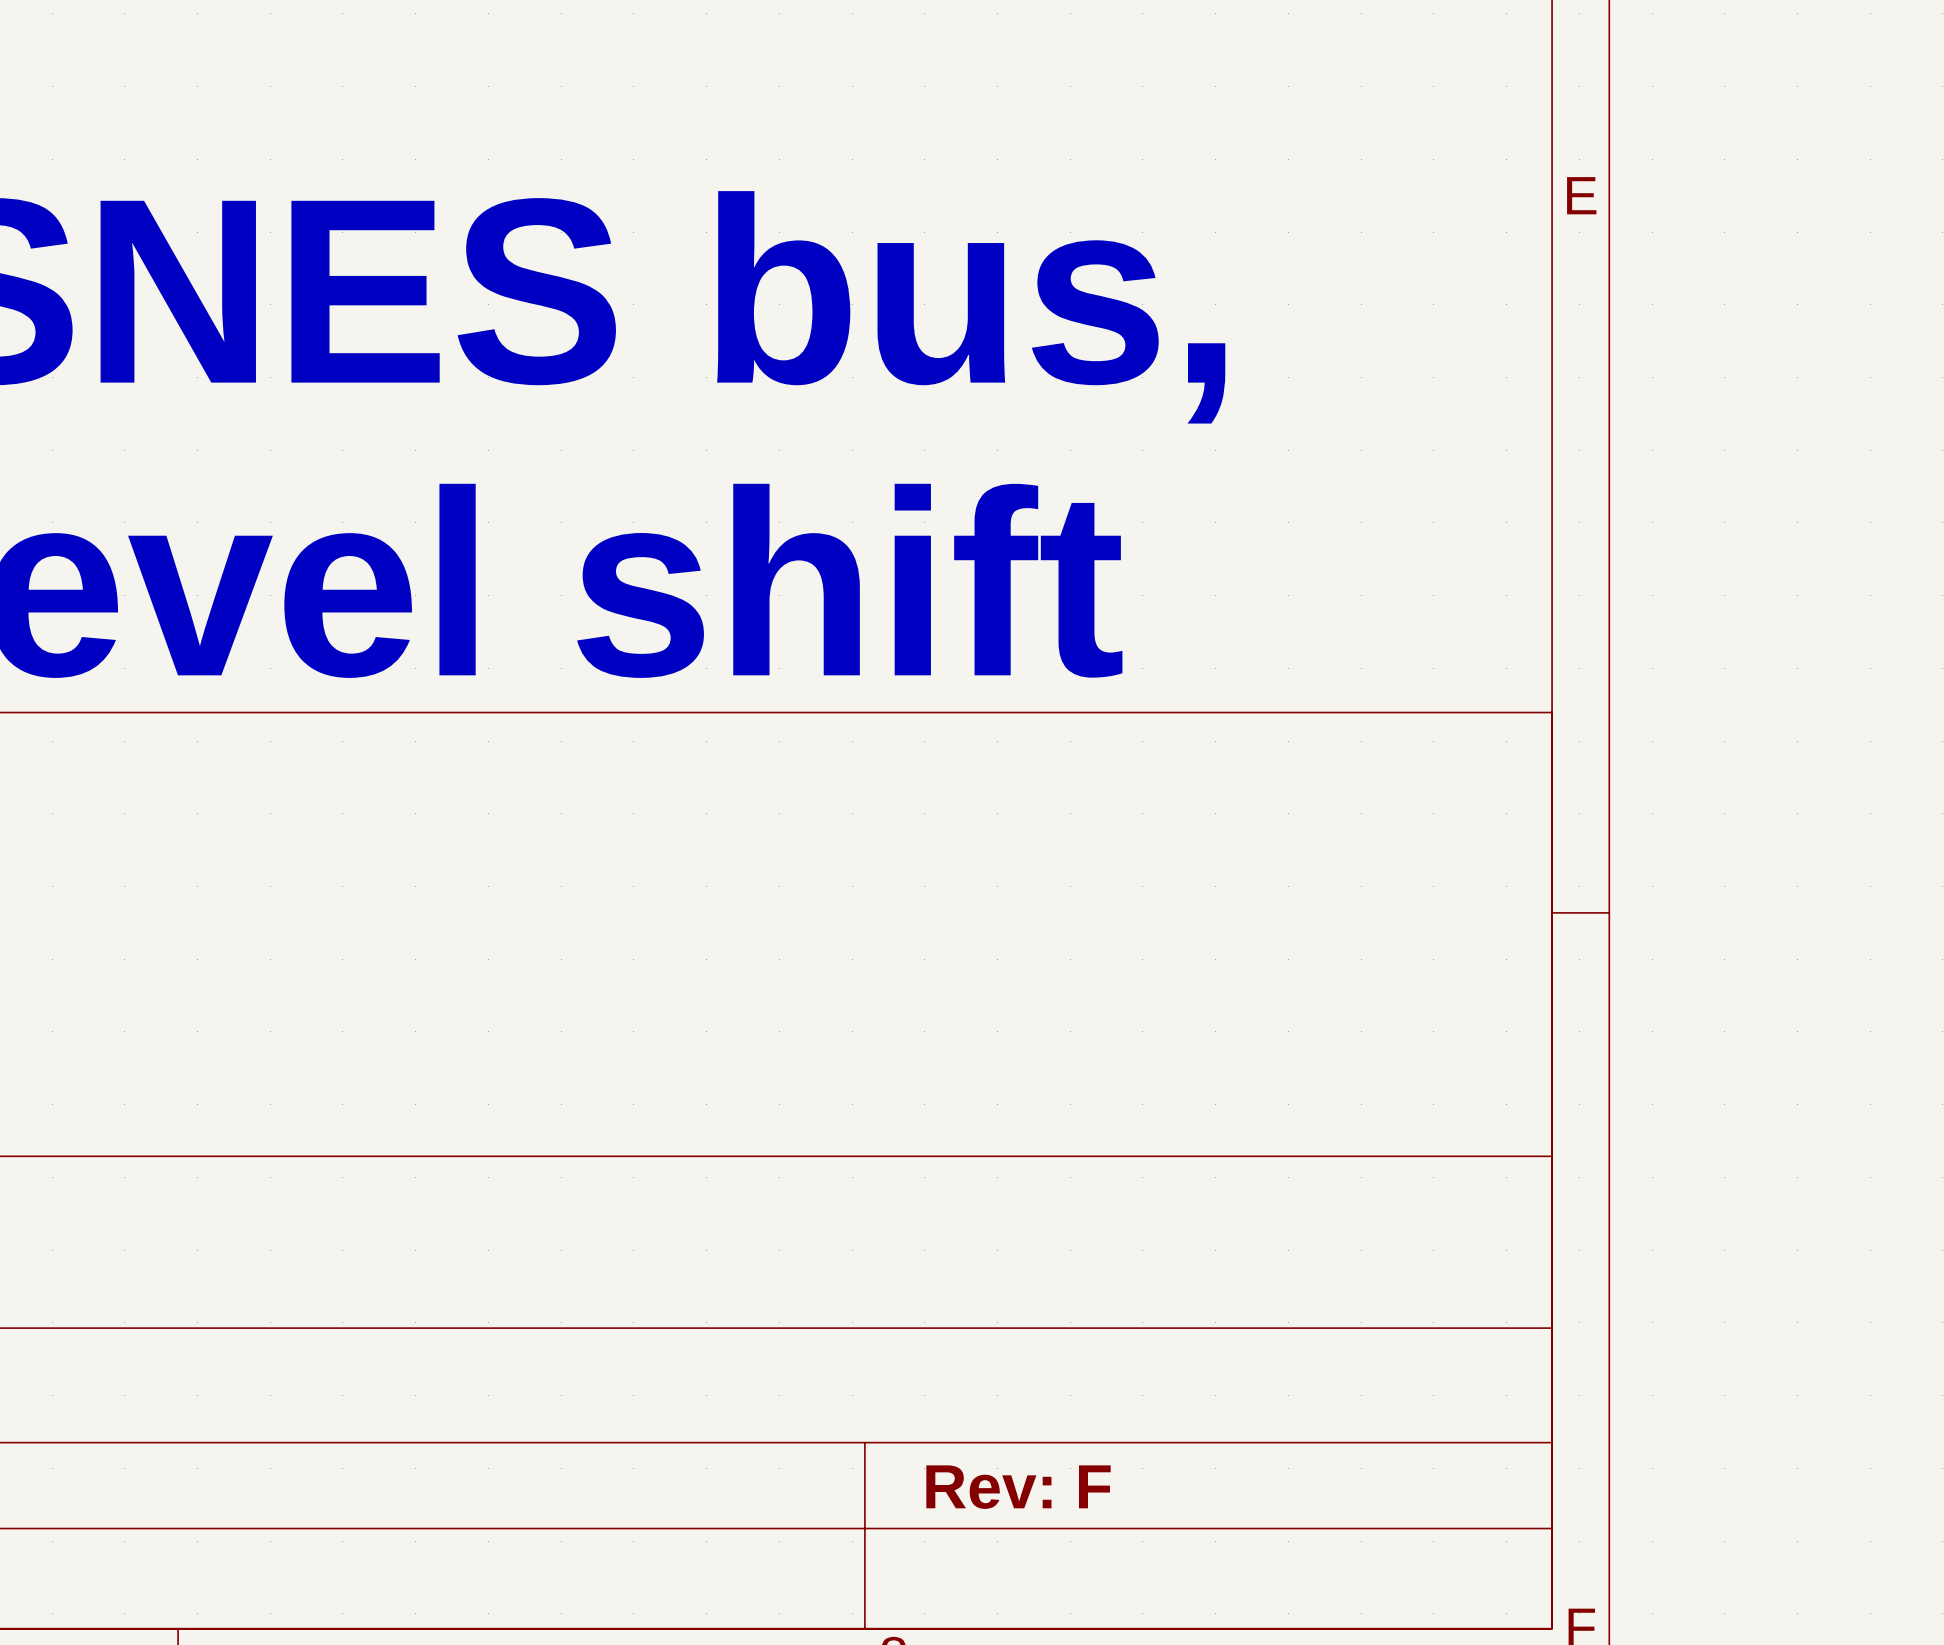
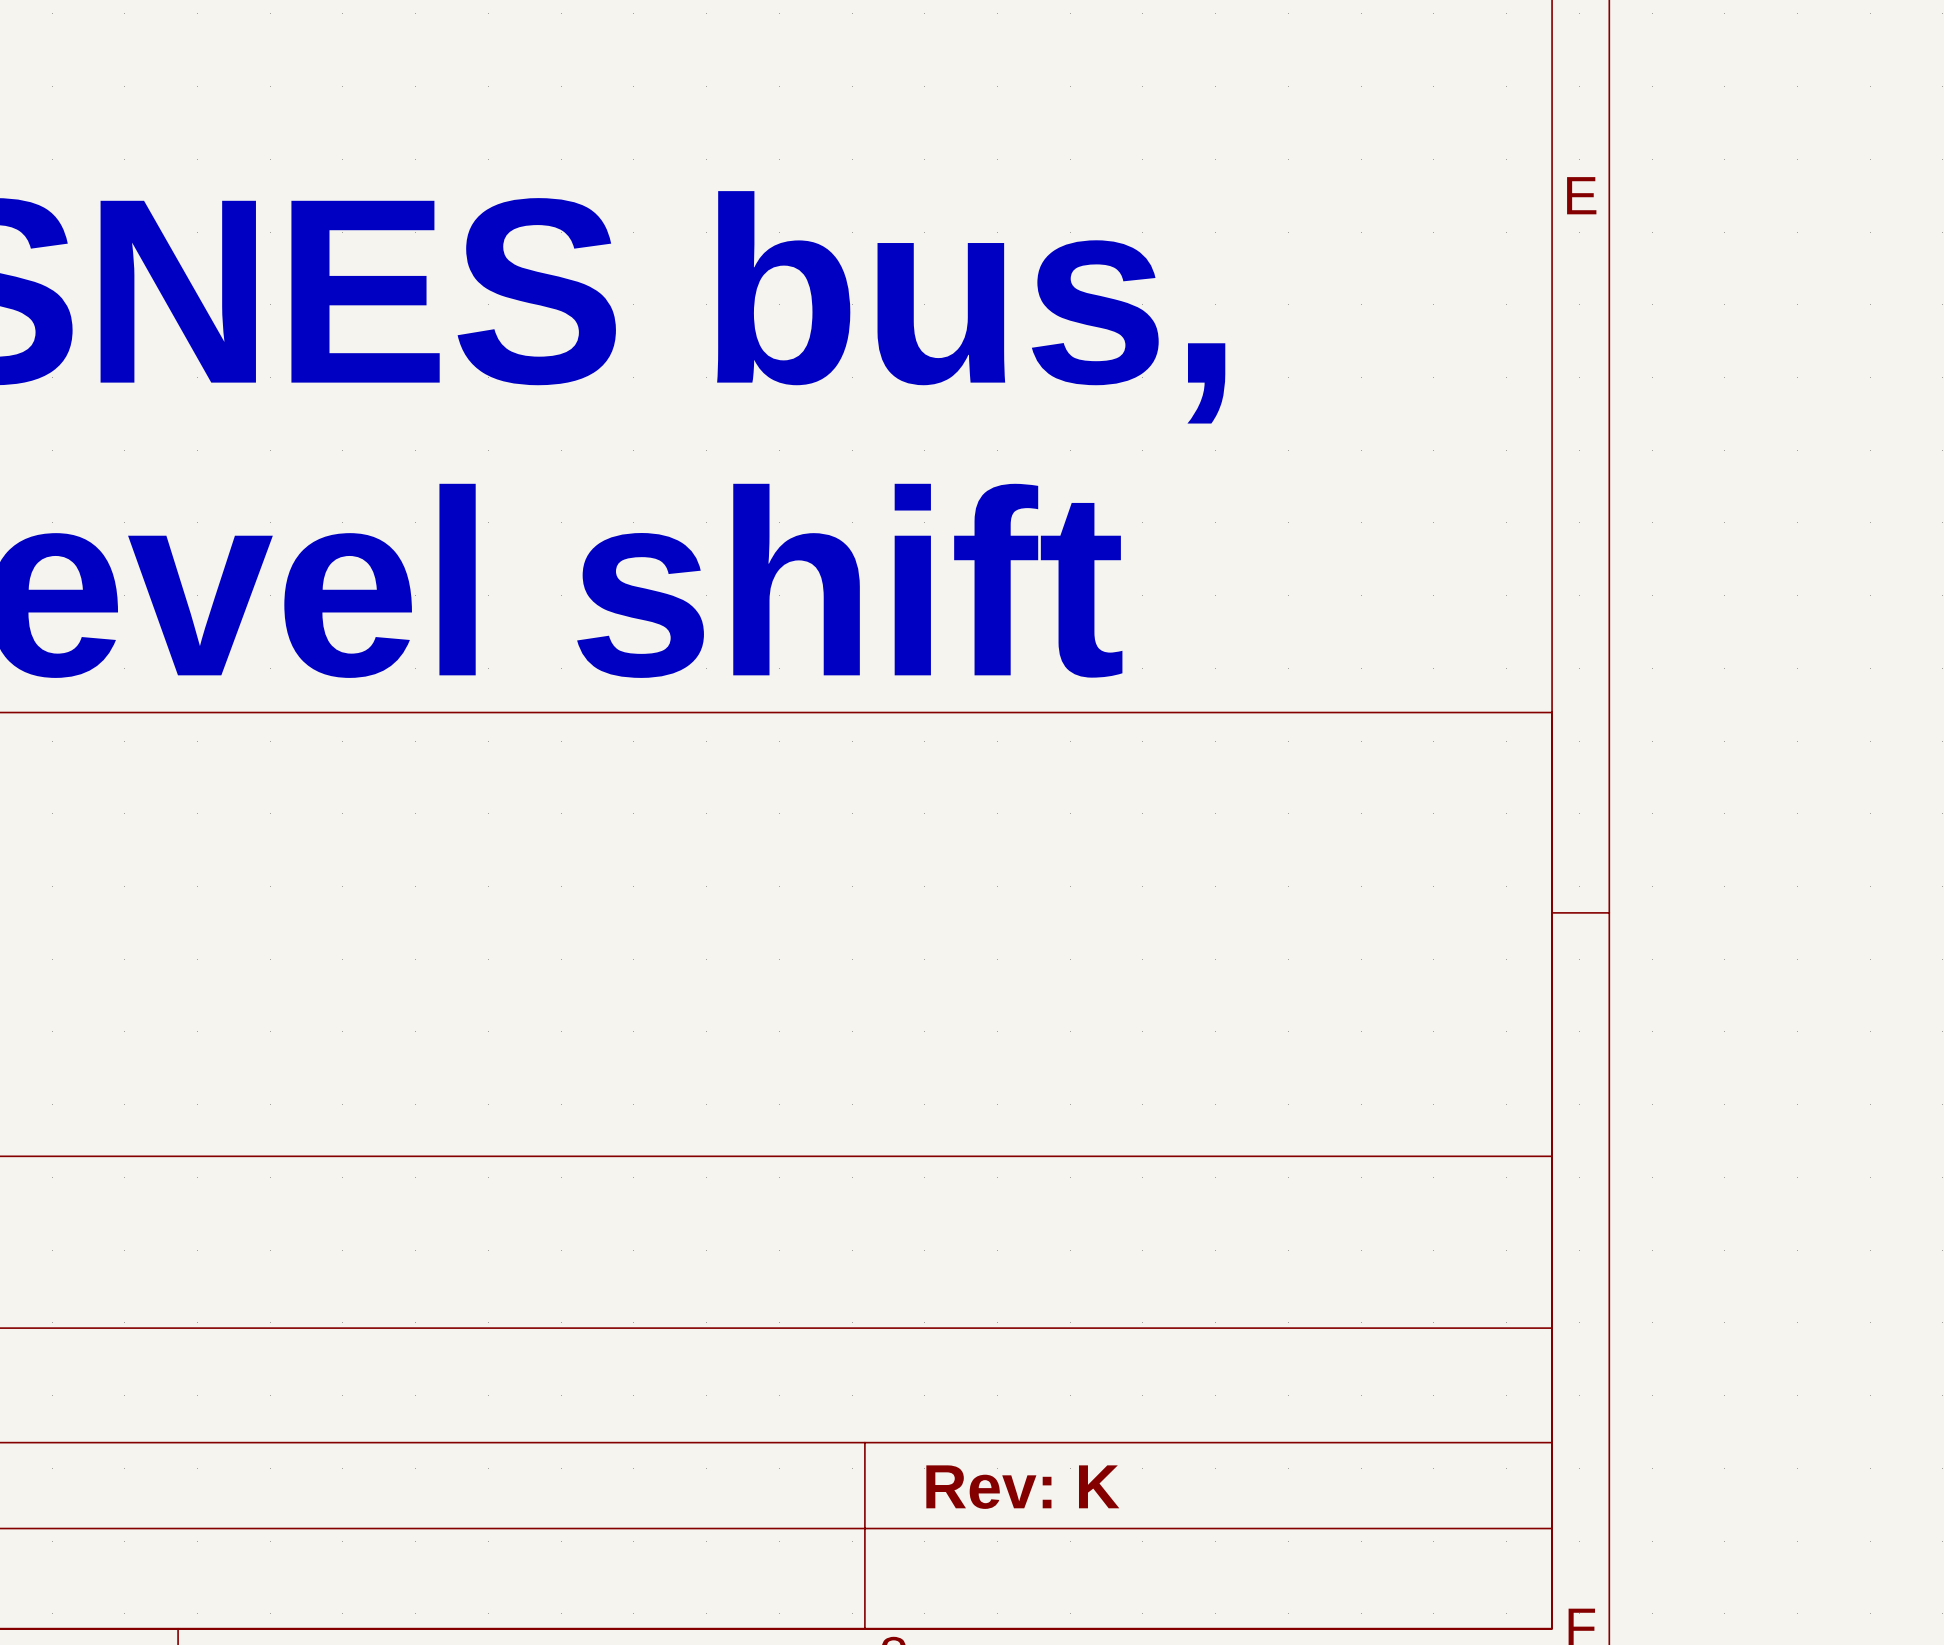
title block: Rev: F (1018, 1487) -> Rev: K (1022, 1487)

